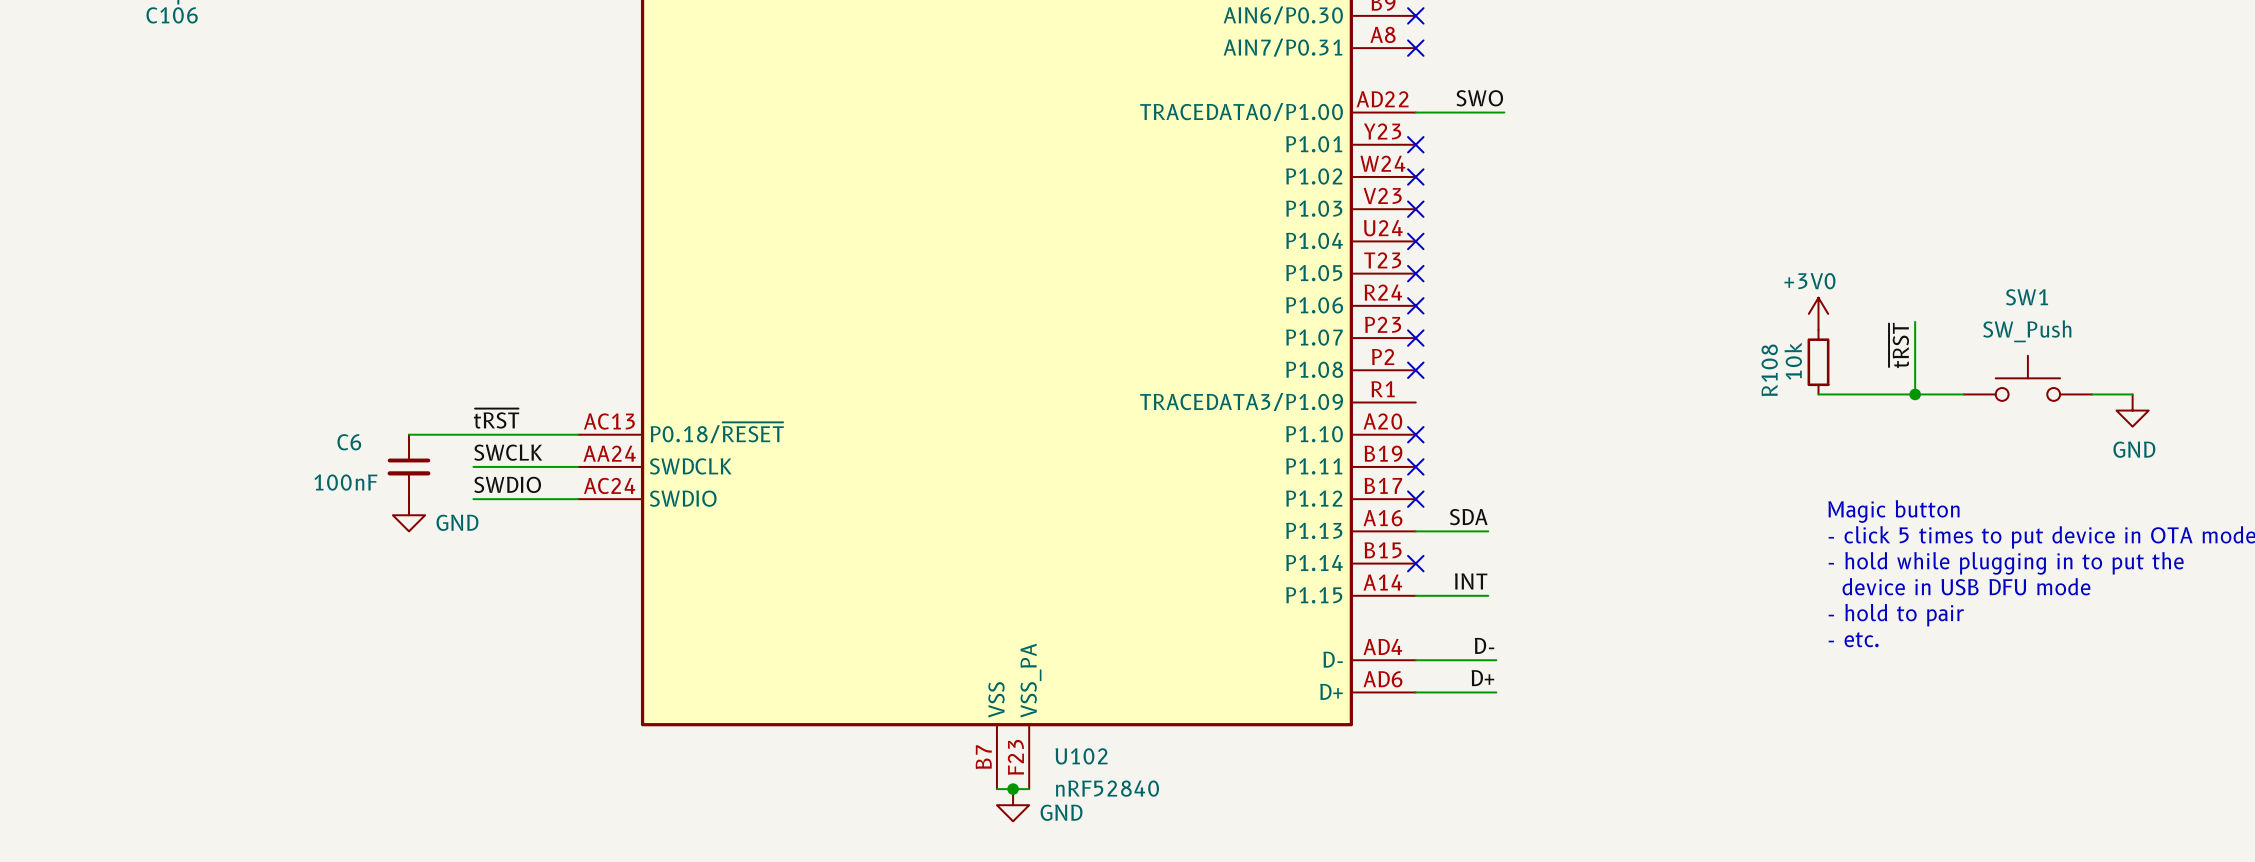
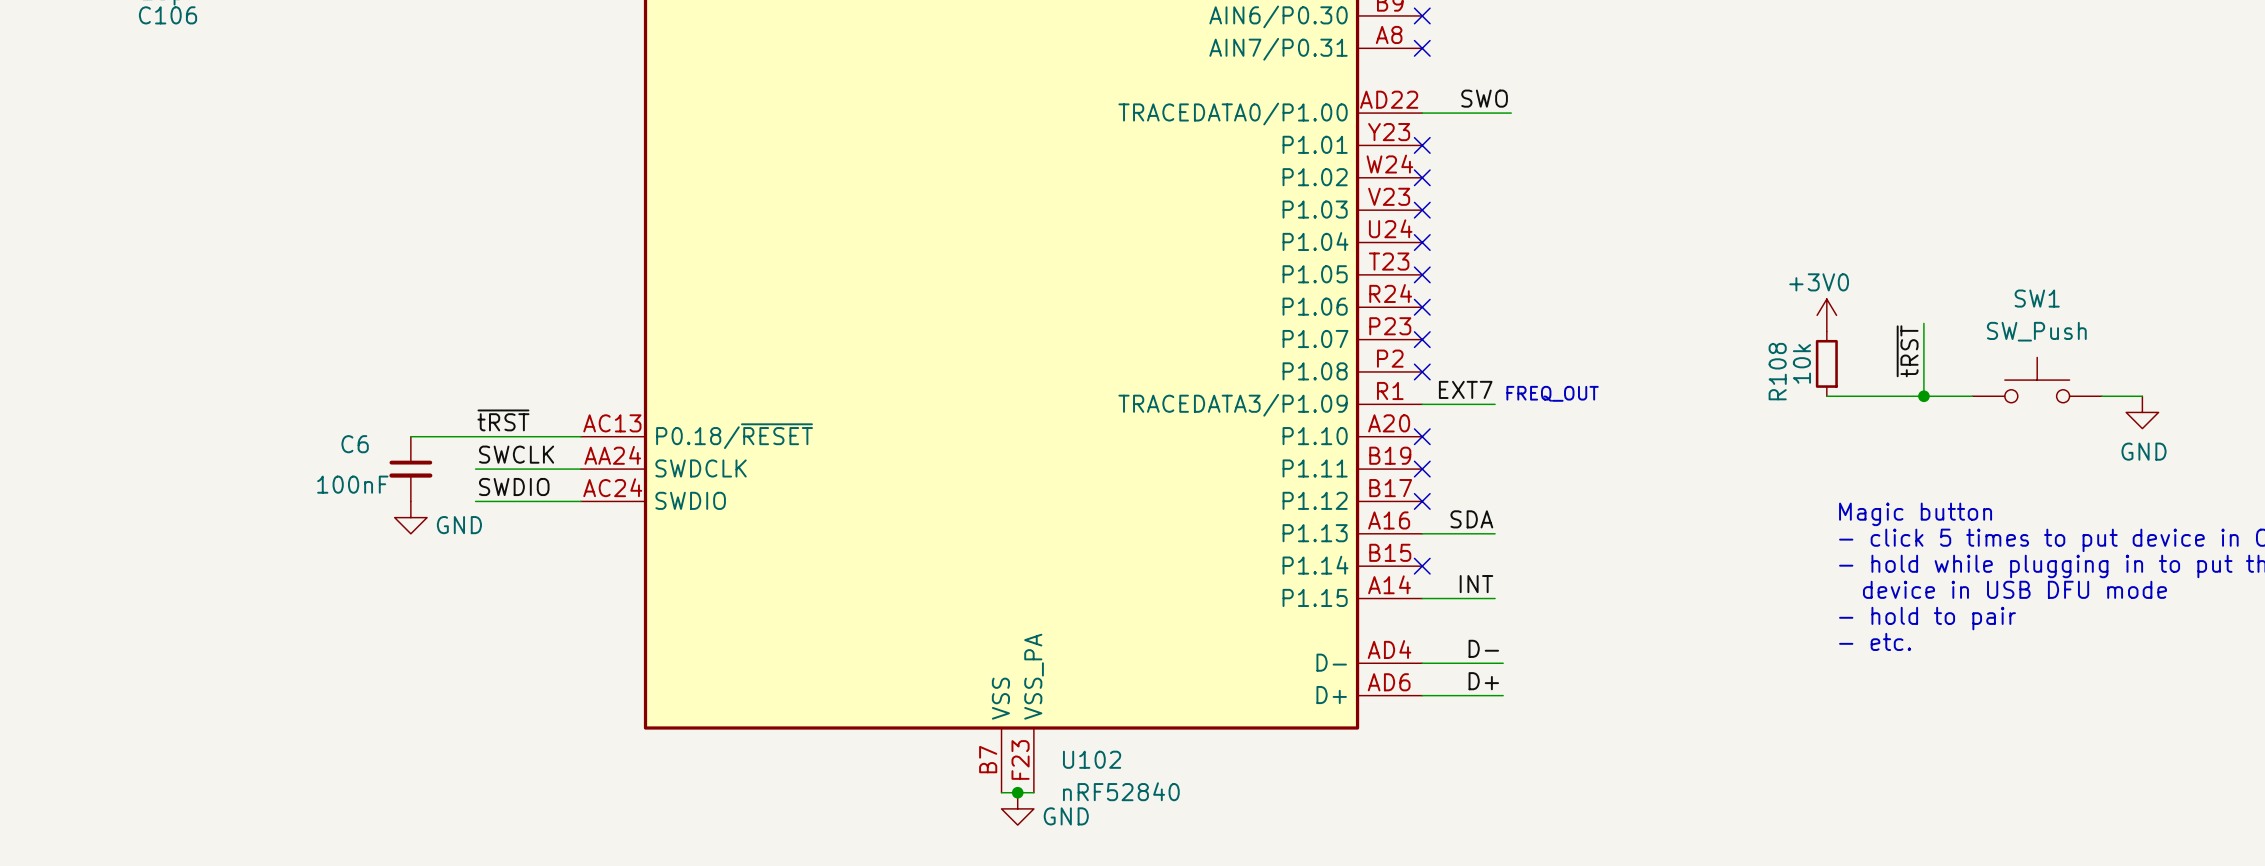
label: none -> EXT7 (1465, 389)
text: none -> FREQ_OUT (1552, 393)
wire: none -> (1422, 404) (1495, 404)

